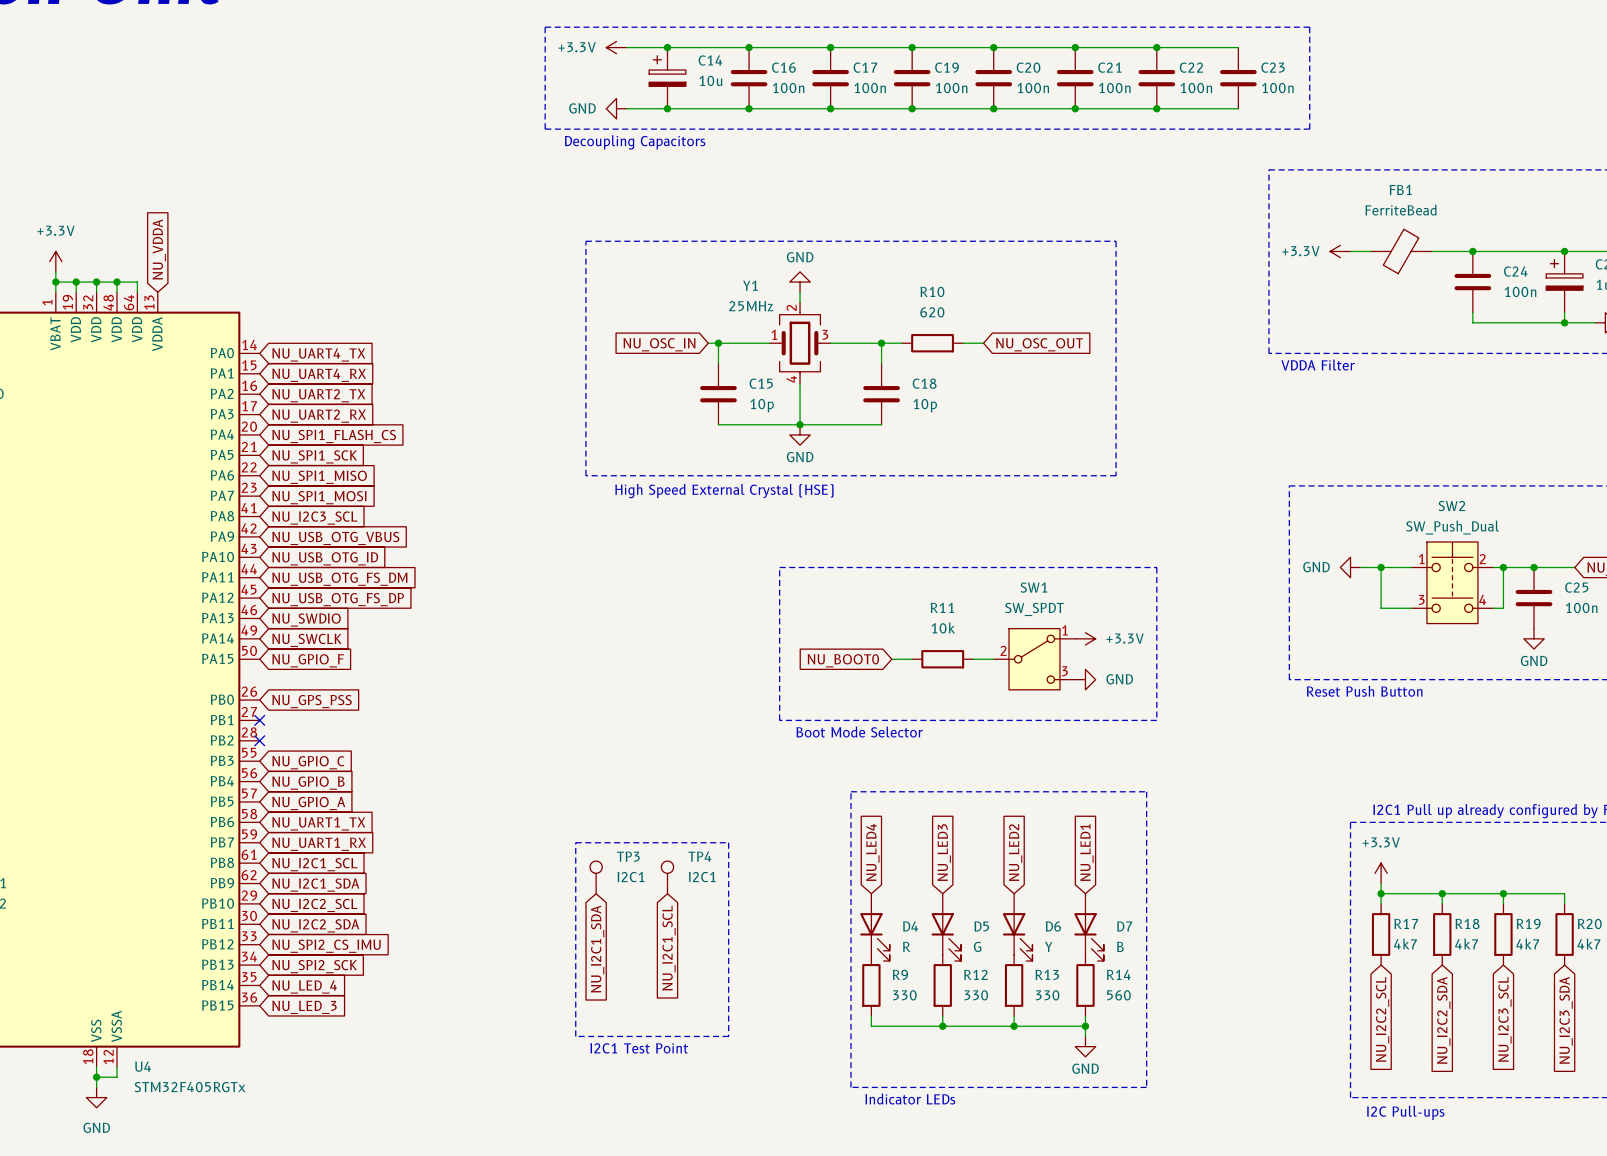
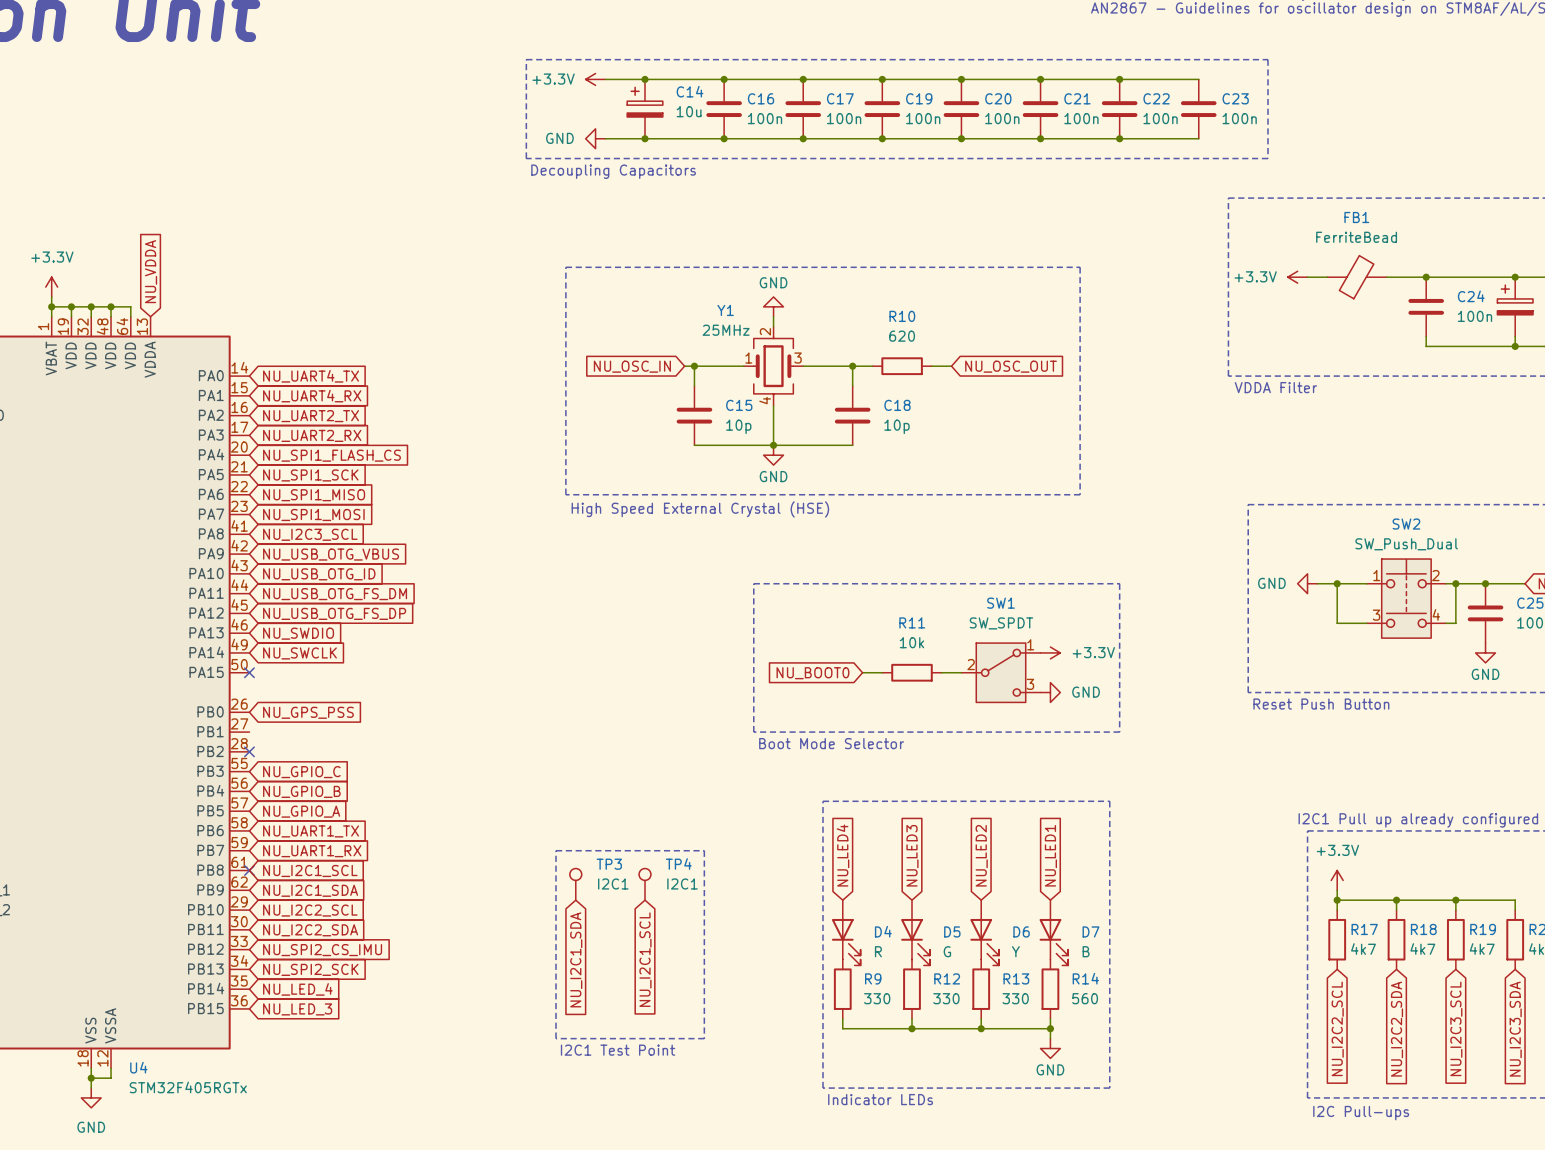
no-connect mark: none -> (249, 672)
global label: NU_GPIO_F (308, 660) -> none
no-connect mark: (259, 720) -> none
no-connect mark: none -> (249, 870)

